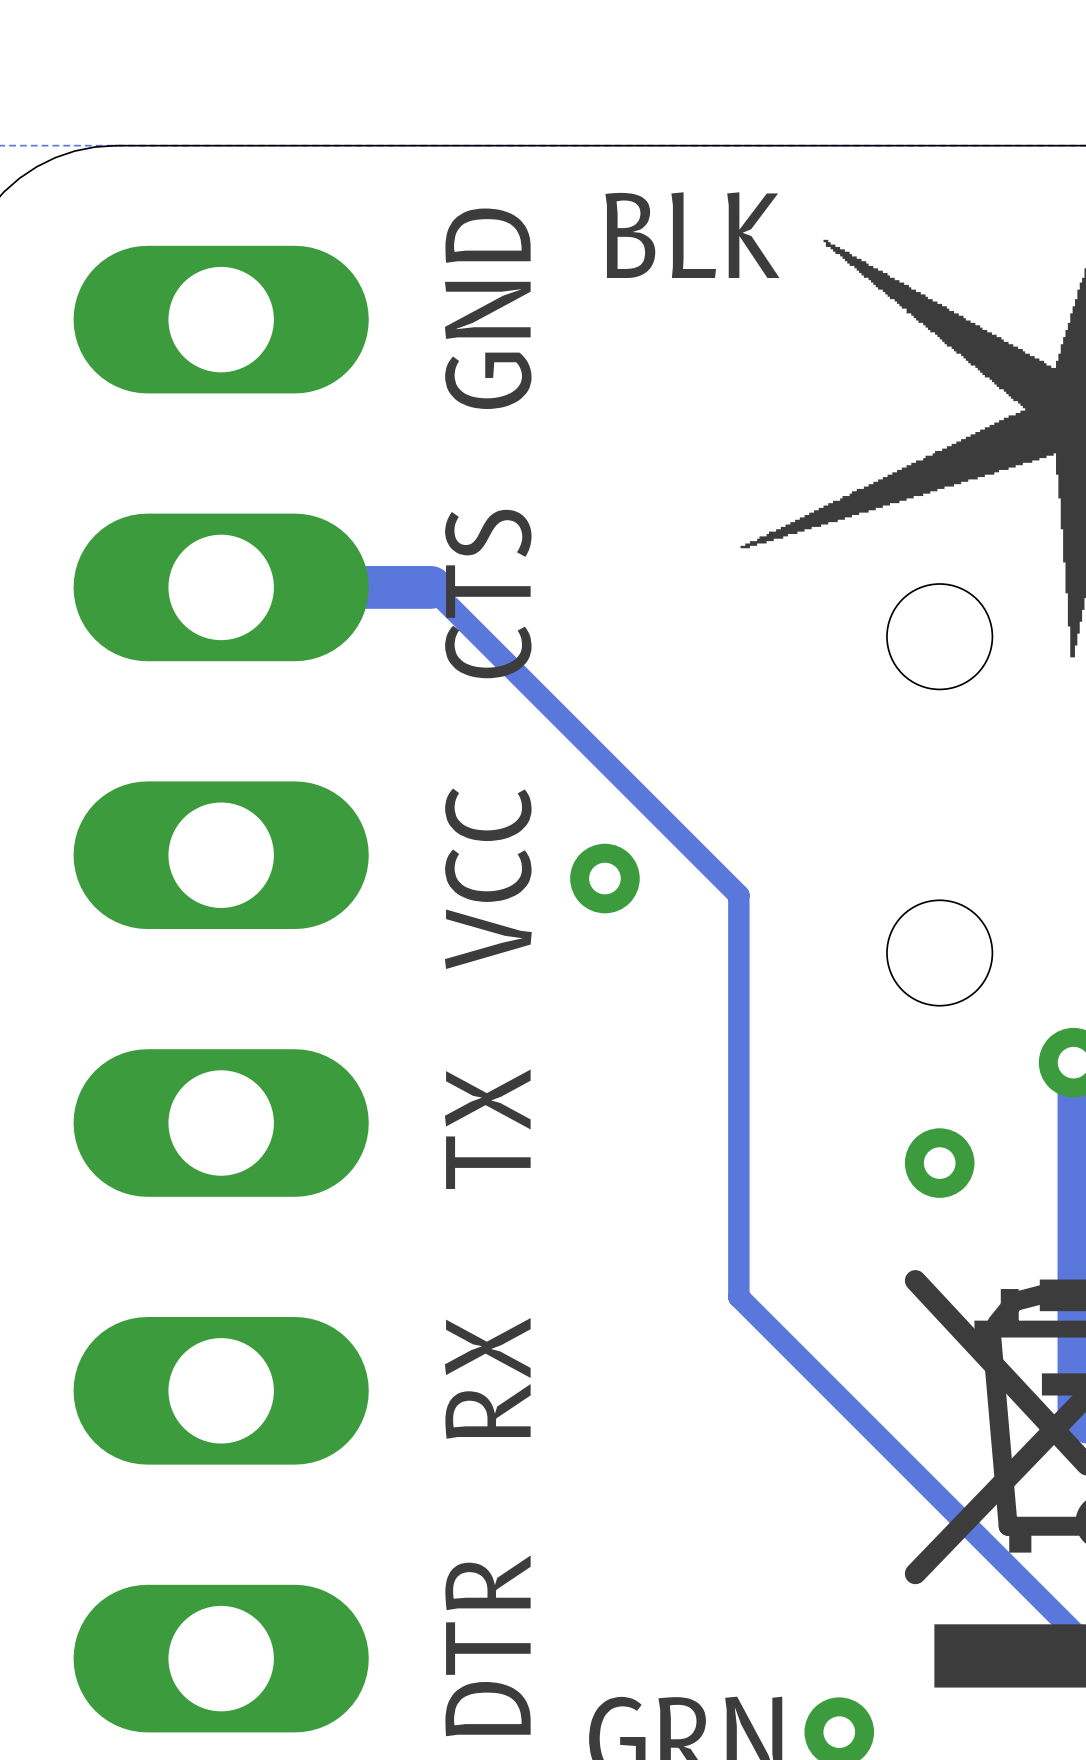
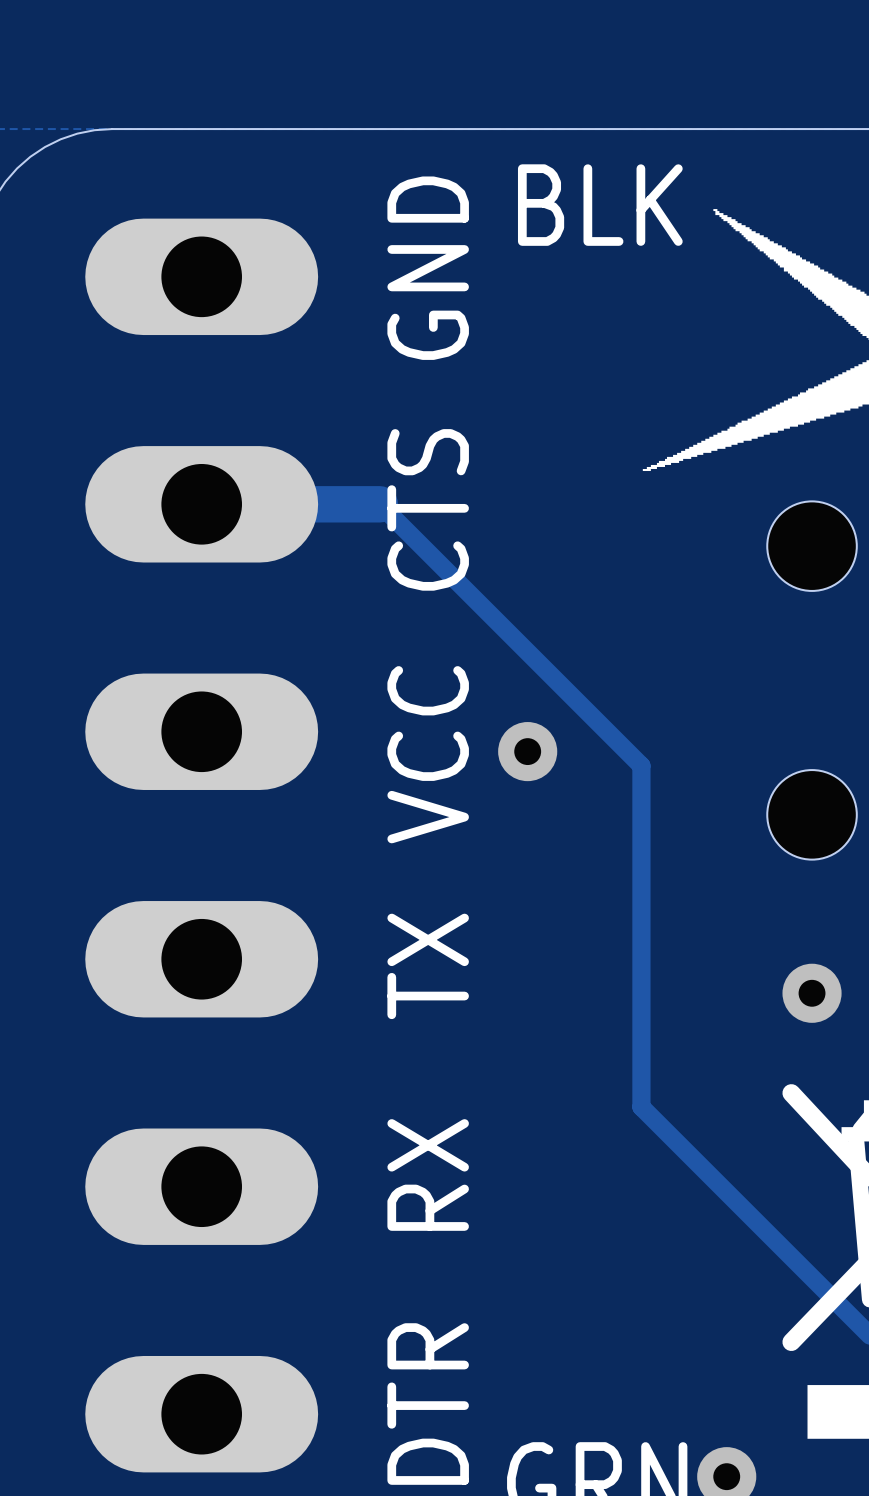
part footprint: [73, 245, 369, 1733] -> [85, 218, 319, 1473]

